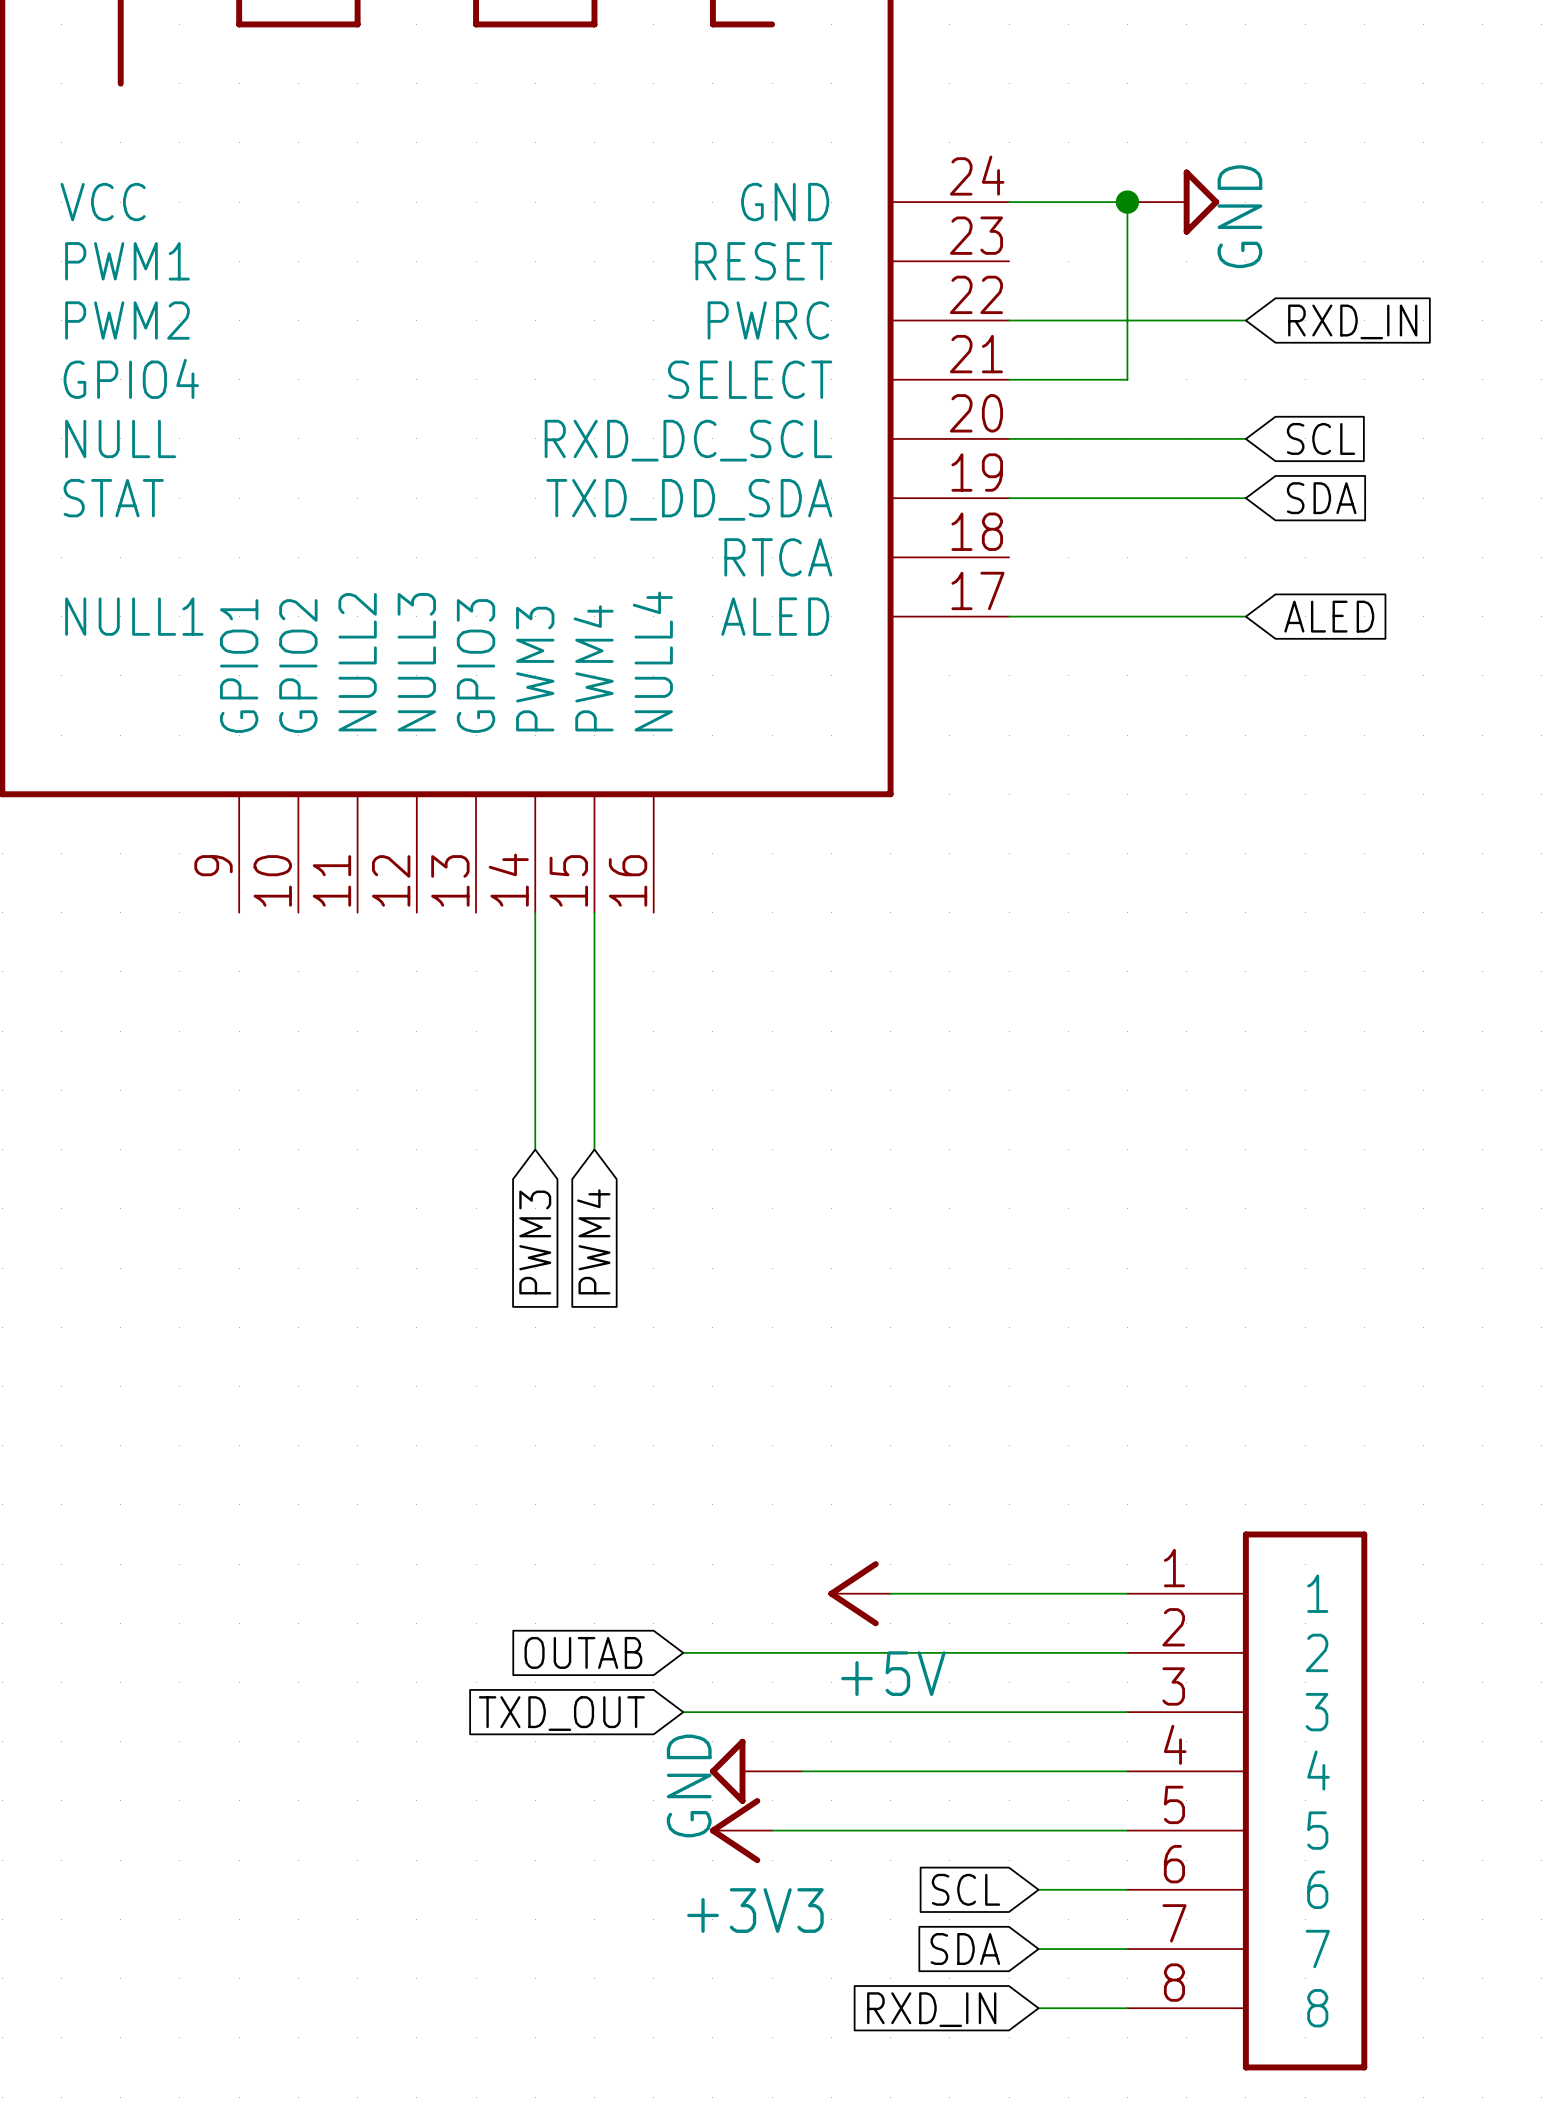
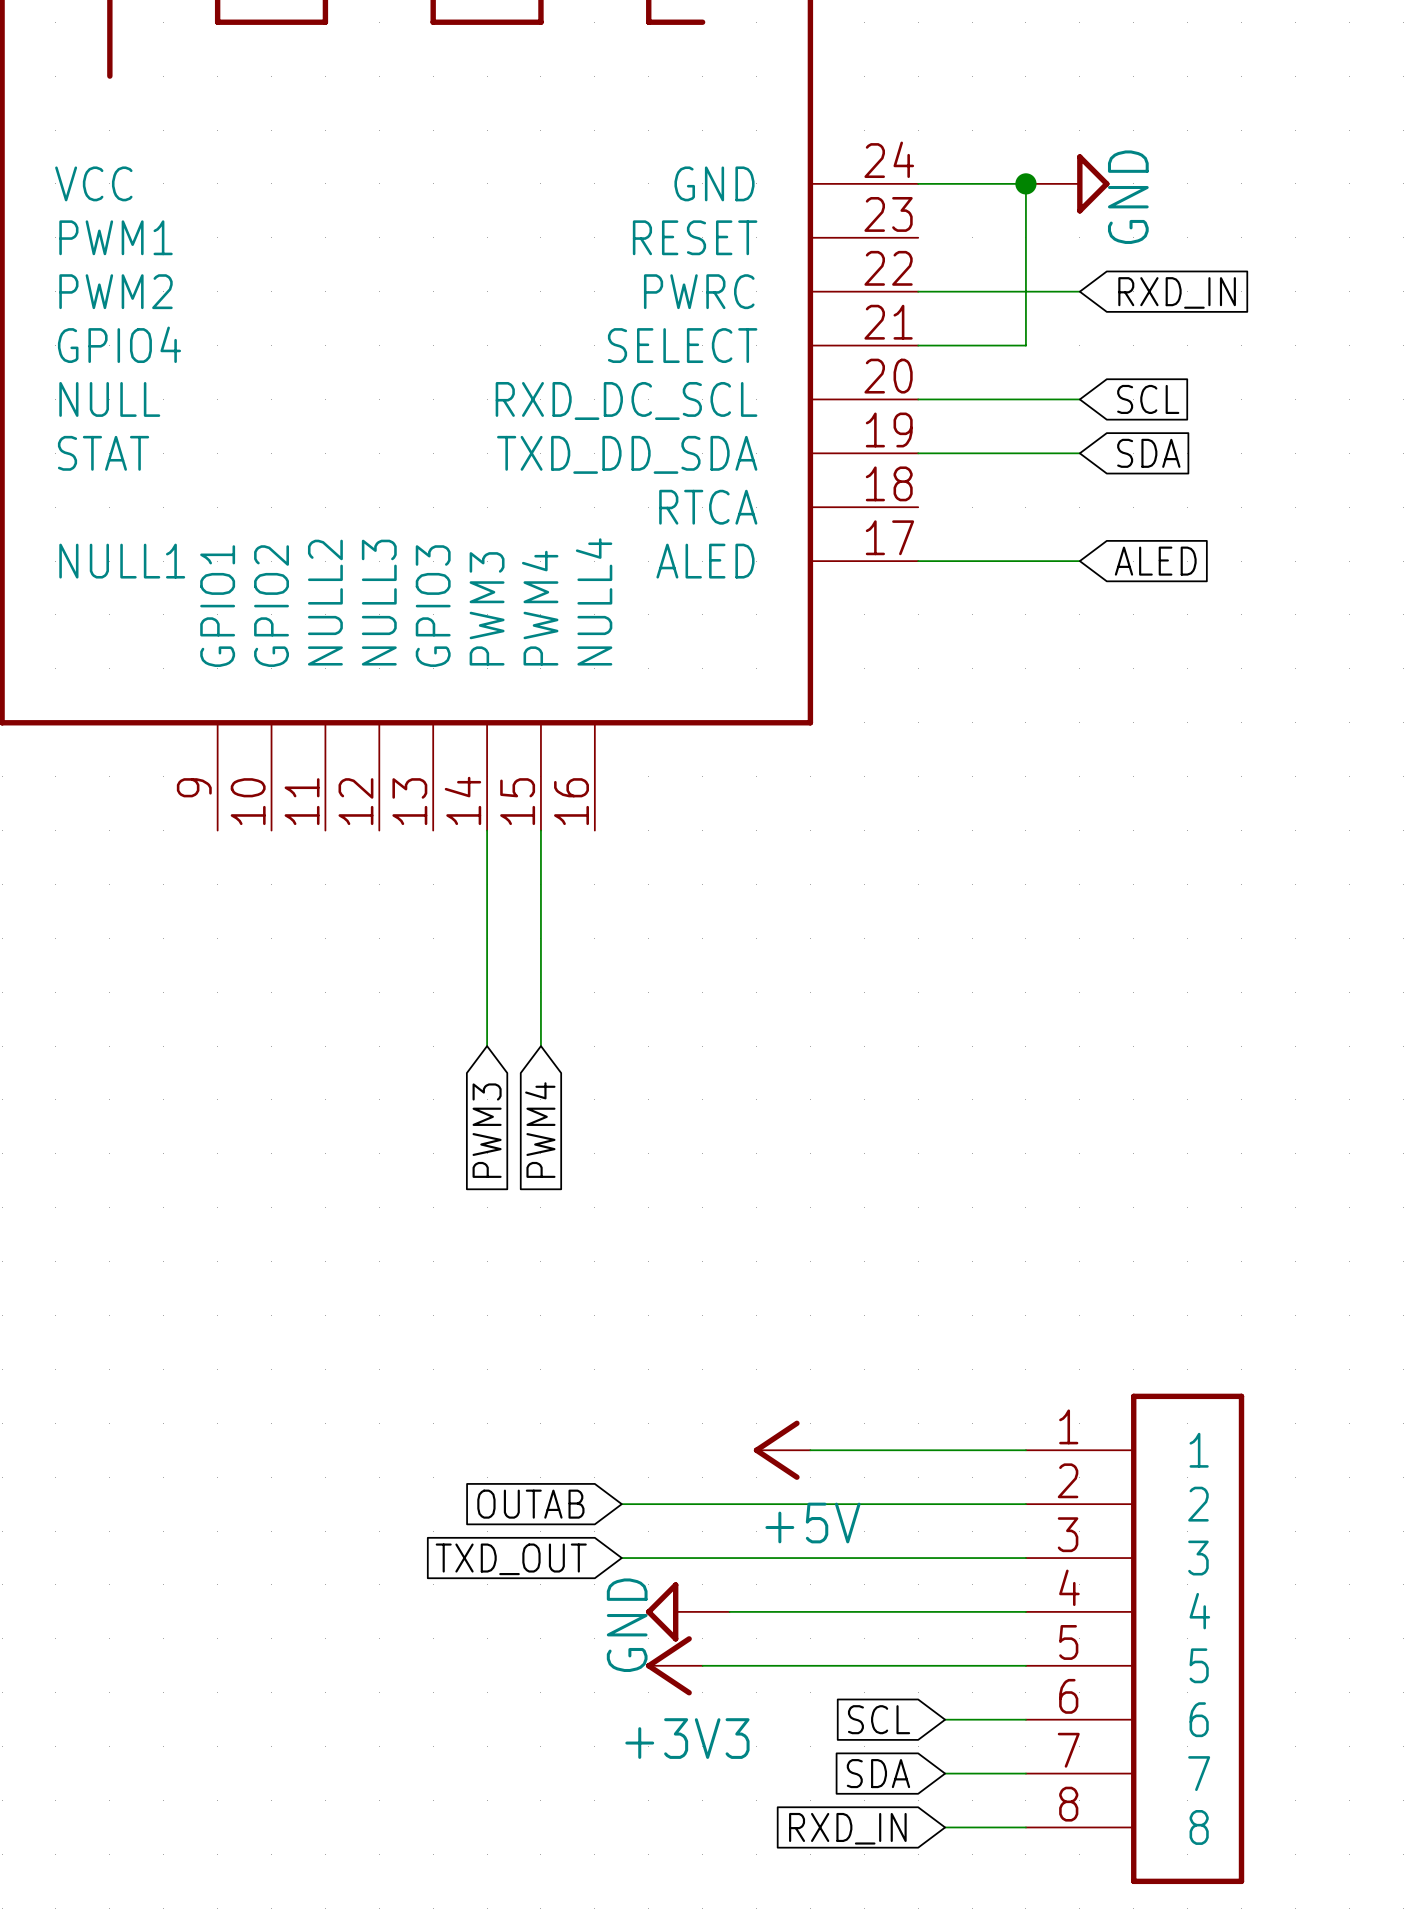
wire: (1186, 320) (1245, 320) -> none
global label position: RXD_IN (1352, 321) -> RXD_IN (1177, 292)
wire: (1186, 438) (1245, 438) -> none
global label position: SCL (1321, 438) -> SCL (1148, 399)
wire: (1186, 498) (1245, 498) -> none
global label position: SDA (1321, 498) -> SDA (1148, 453)
wire: (1186, 616) (1245, 616) -> none
global label position: ALED (1329, 616) -> ALED (1155, 561)

